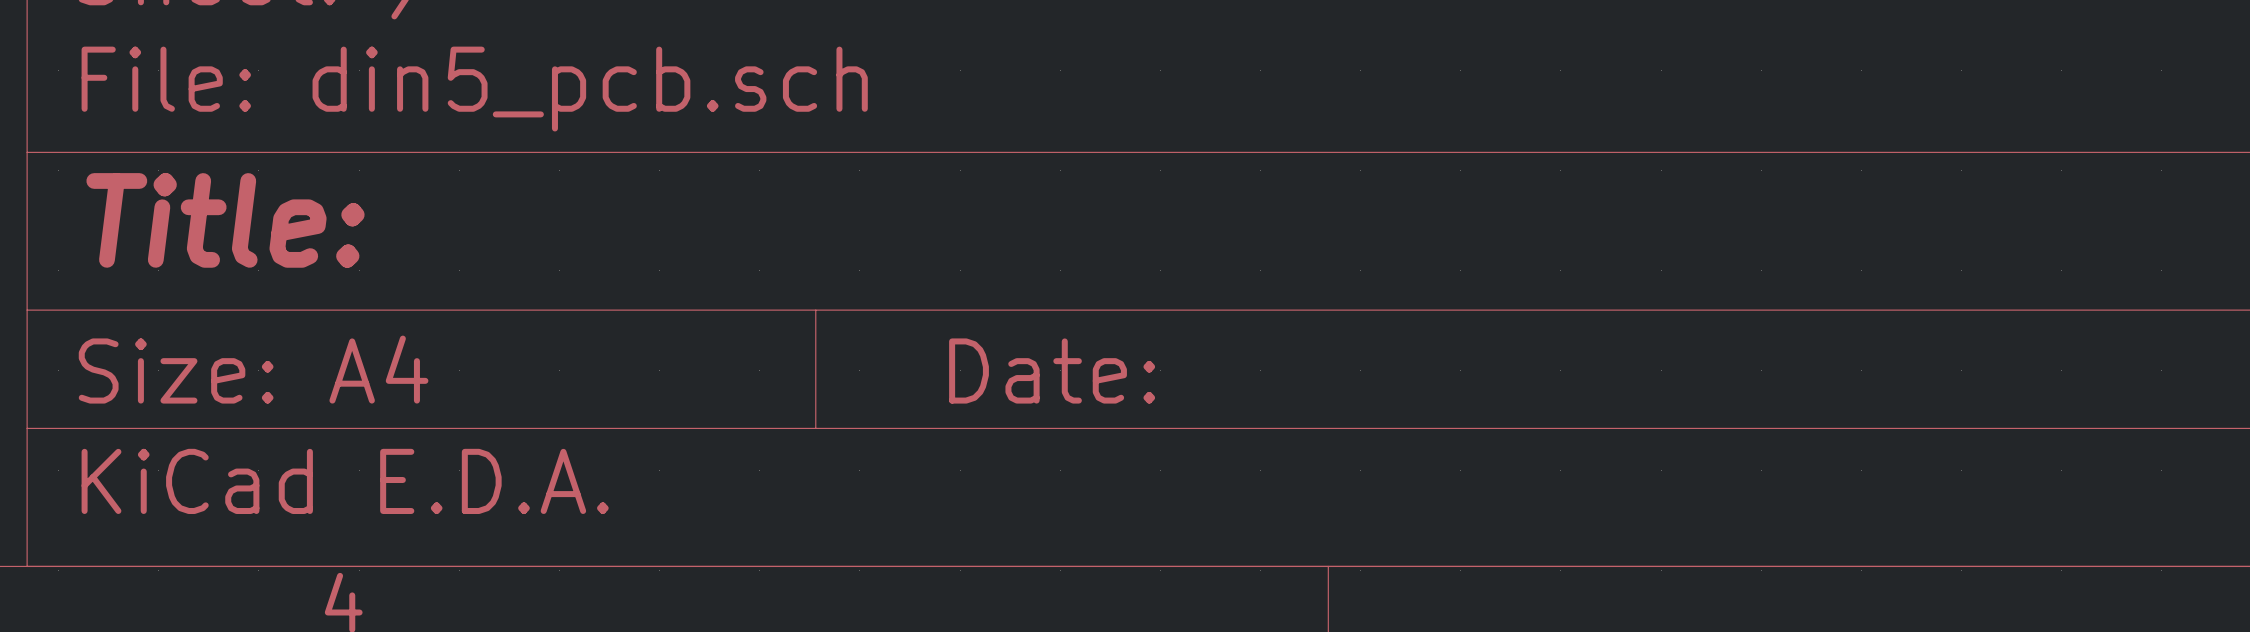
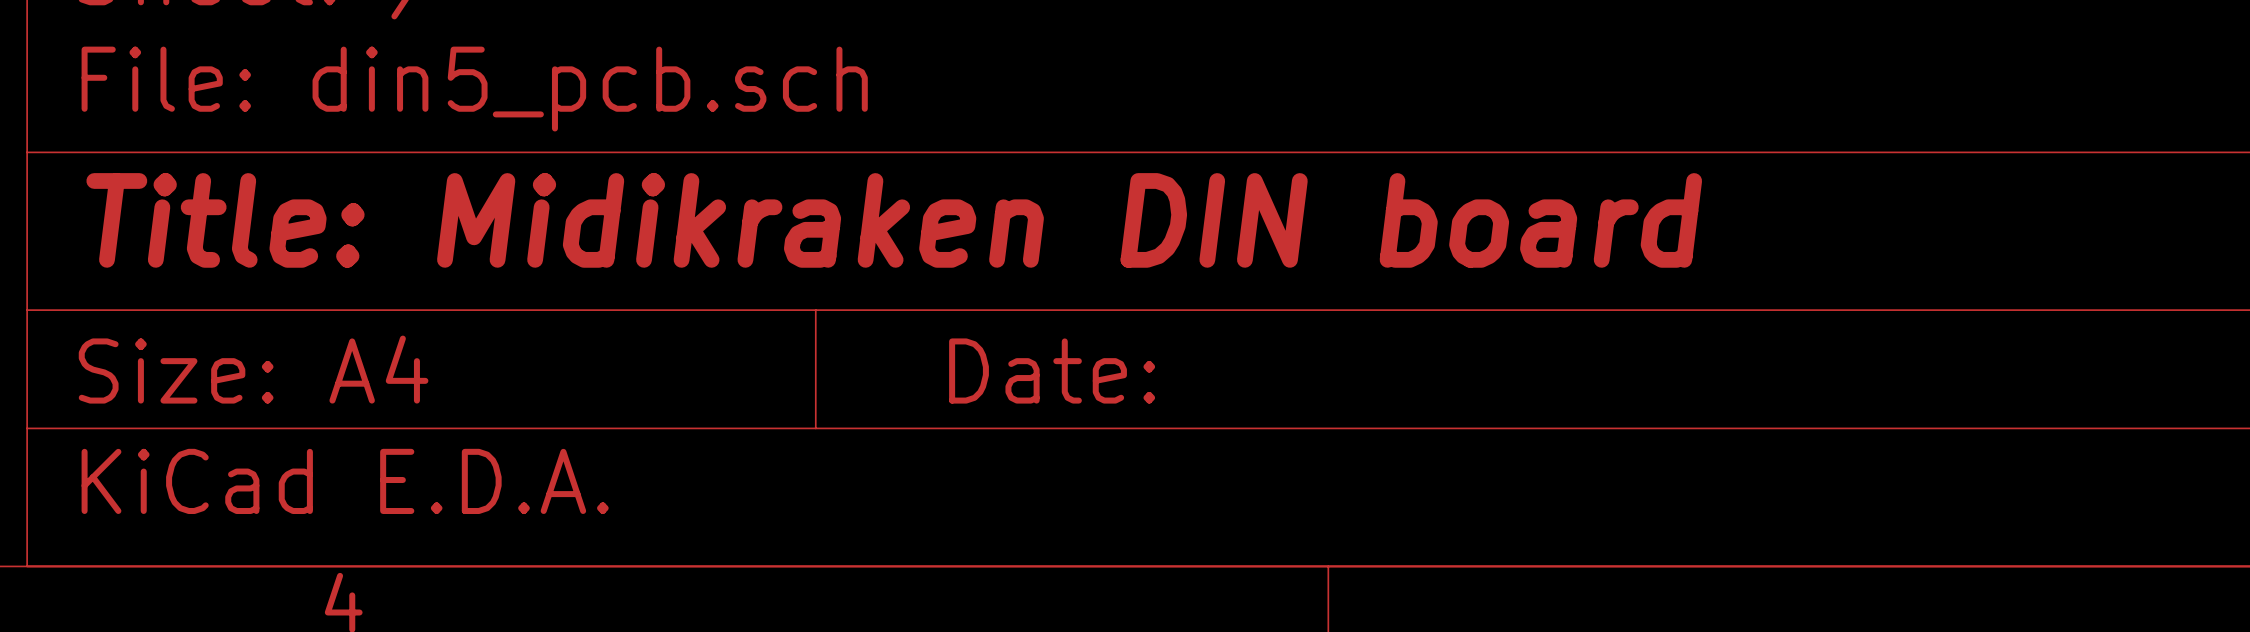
title block: Title: (225, 220) -> Title: Midikraken DIN board (894, 220)

